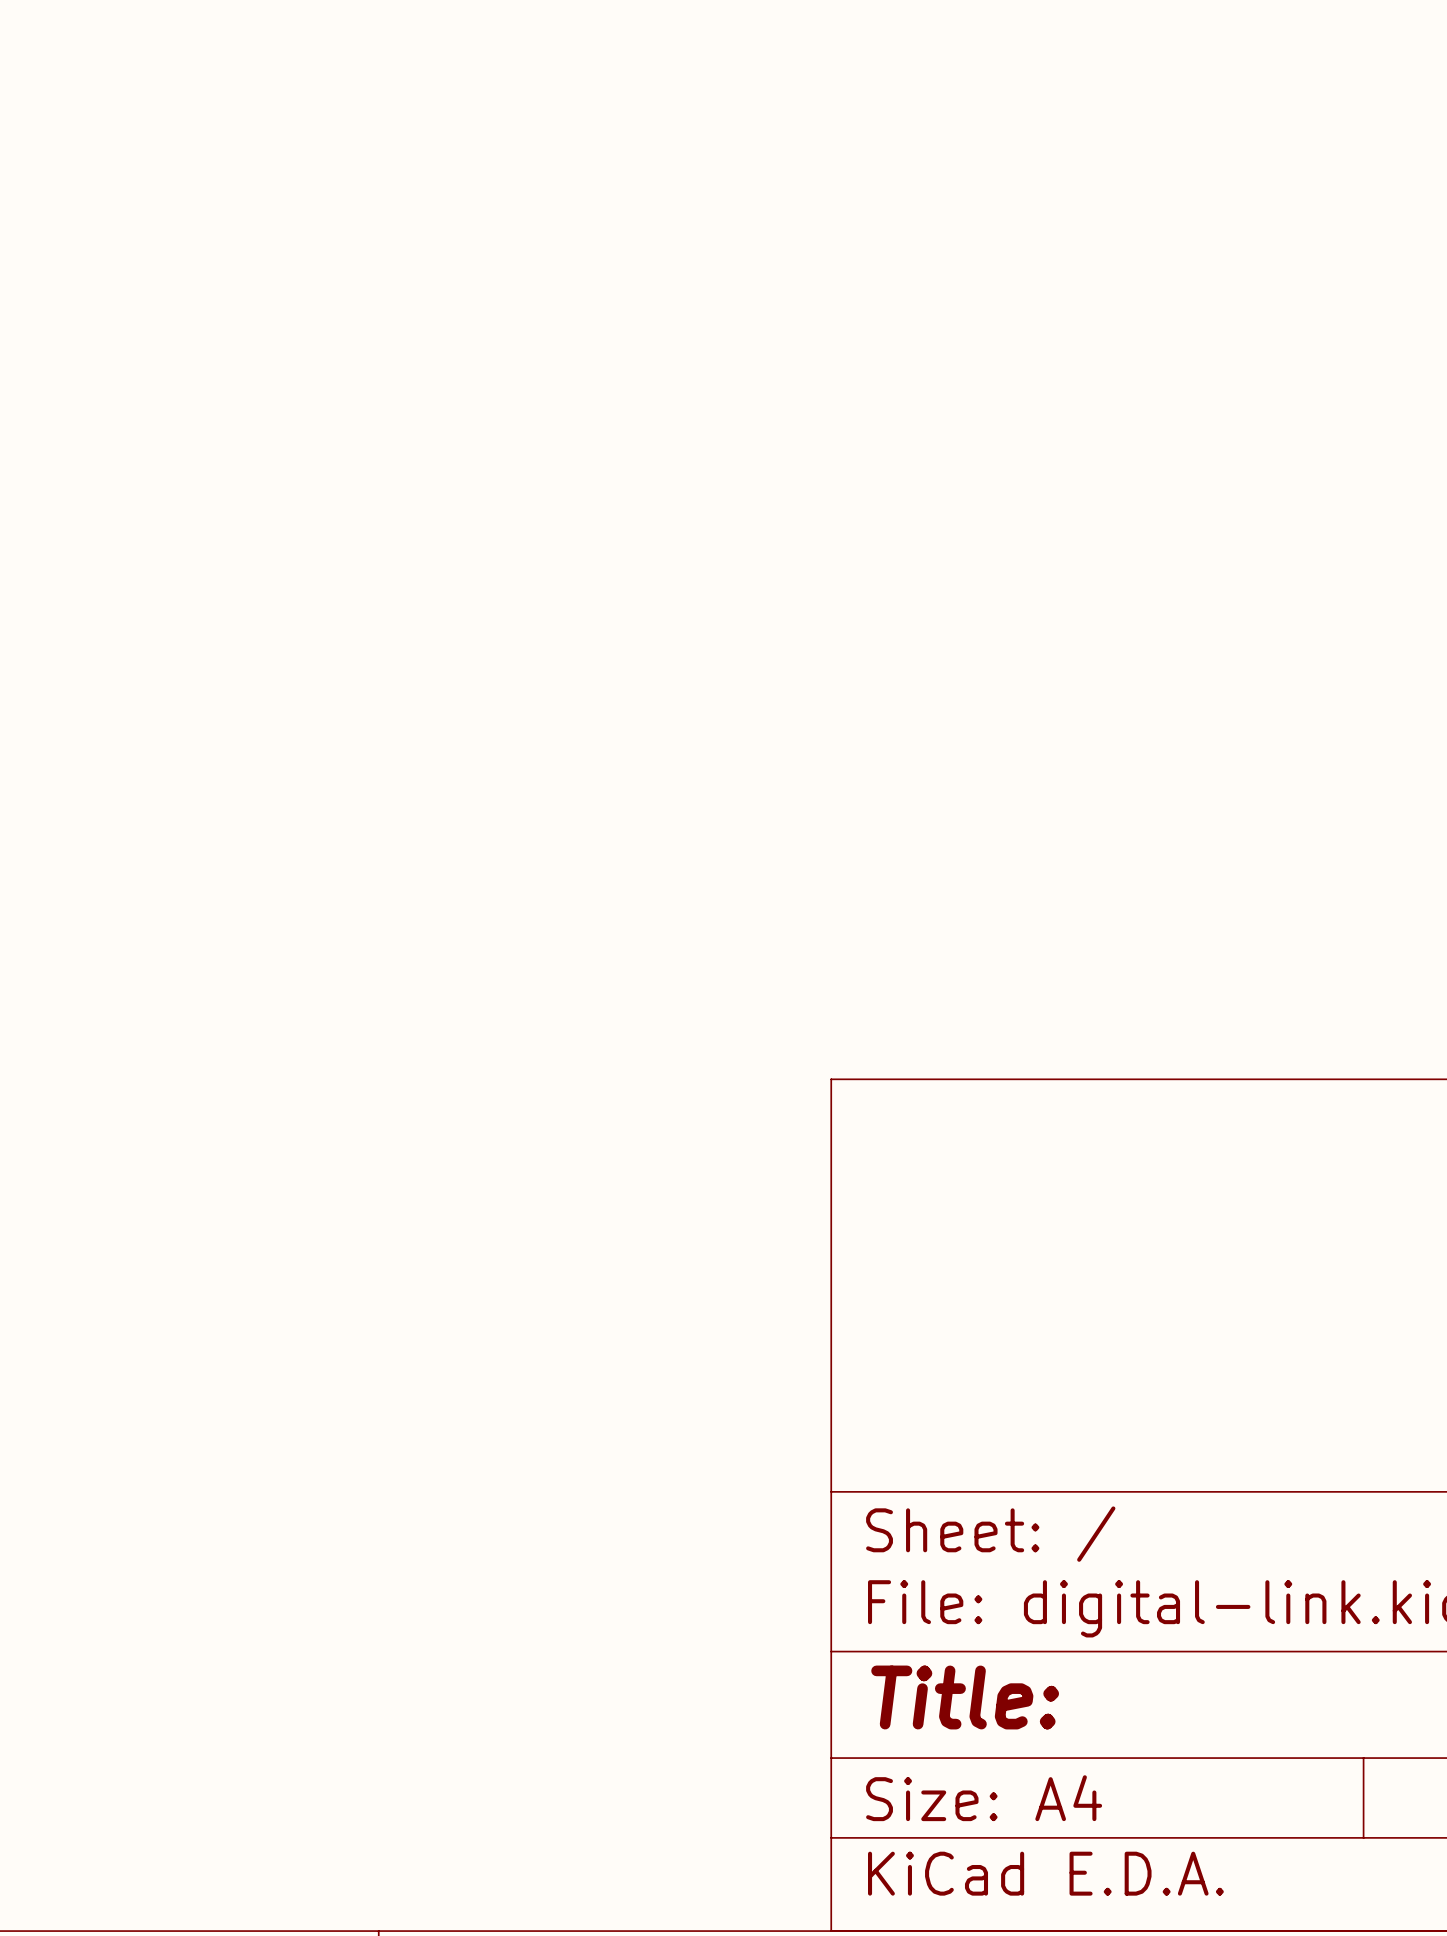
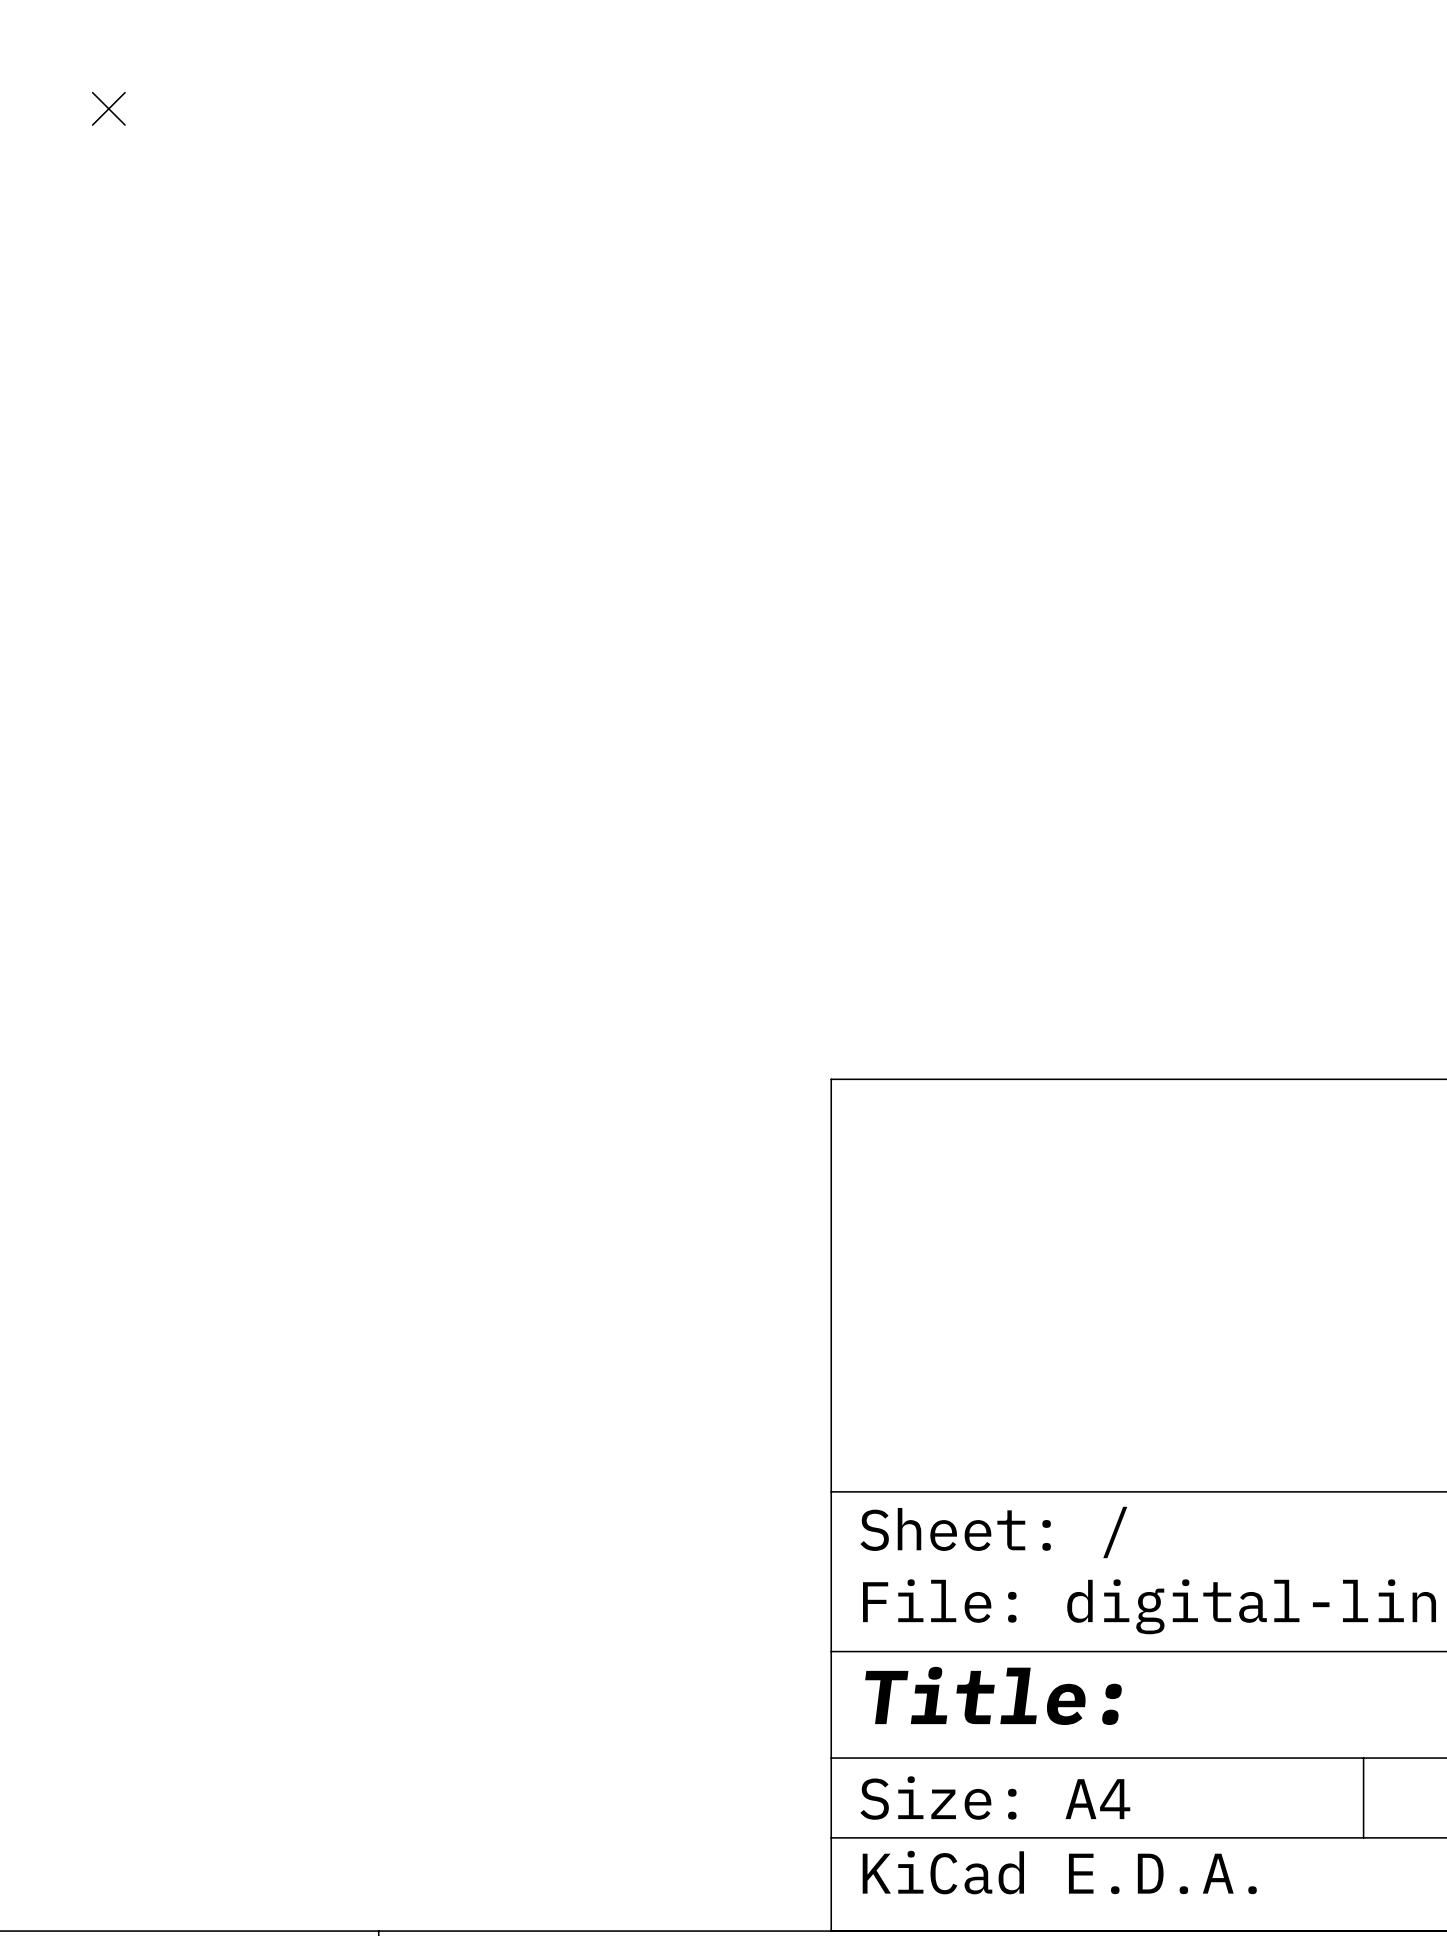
no-connect mark: none -> (108, 108)

